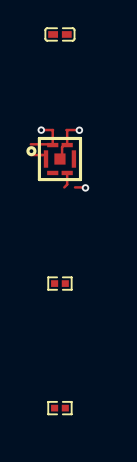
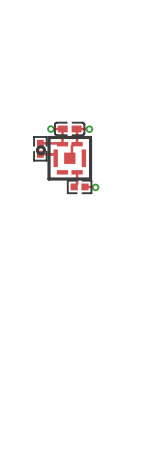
part position: (59, 34) -> (69, 128)
part: none -> (40, 148)
part: none -> (79, 186)
part: (59, 283) -> none
part: (59, 408) -> none

